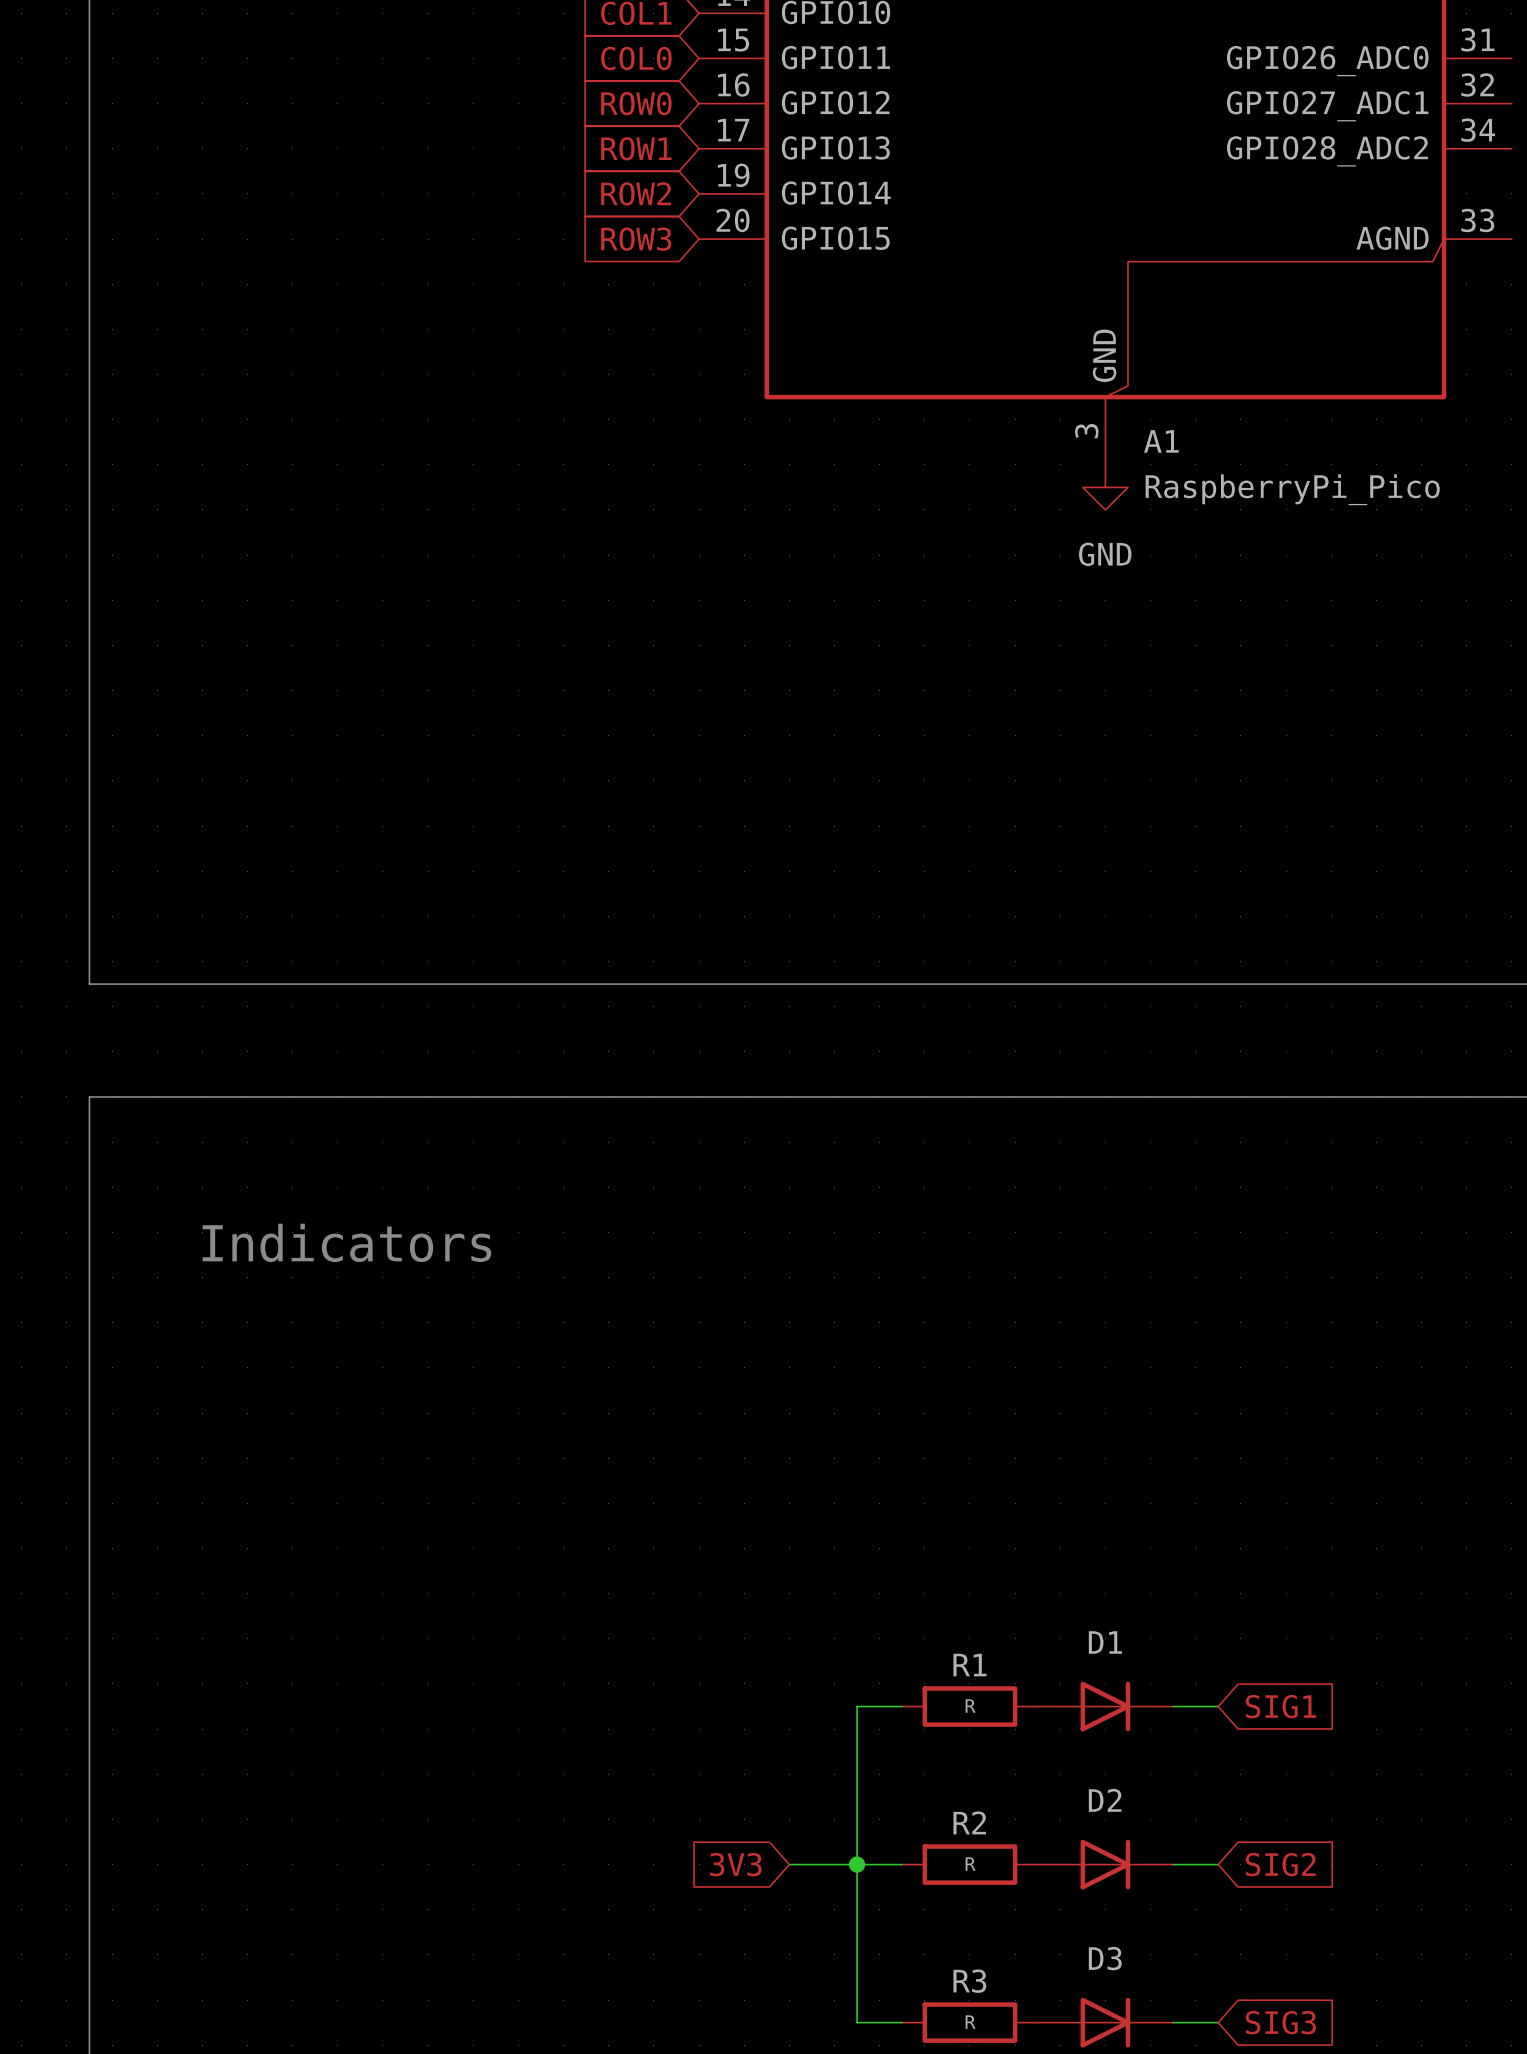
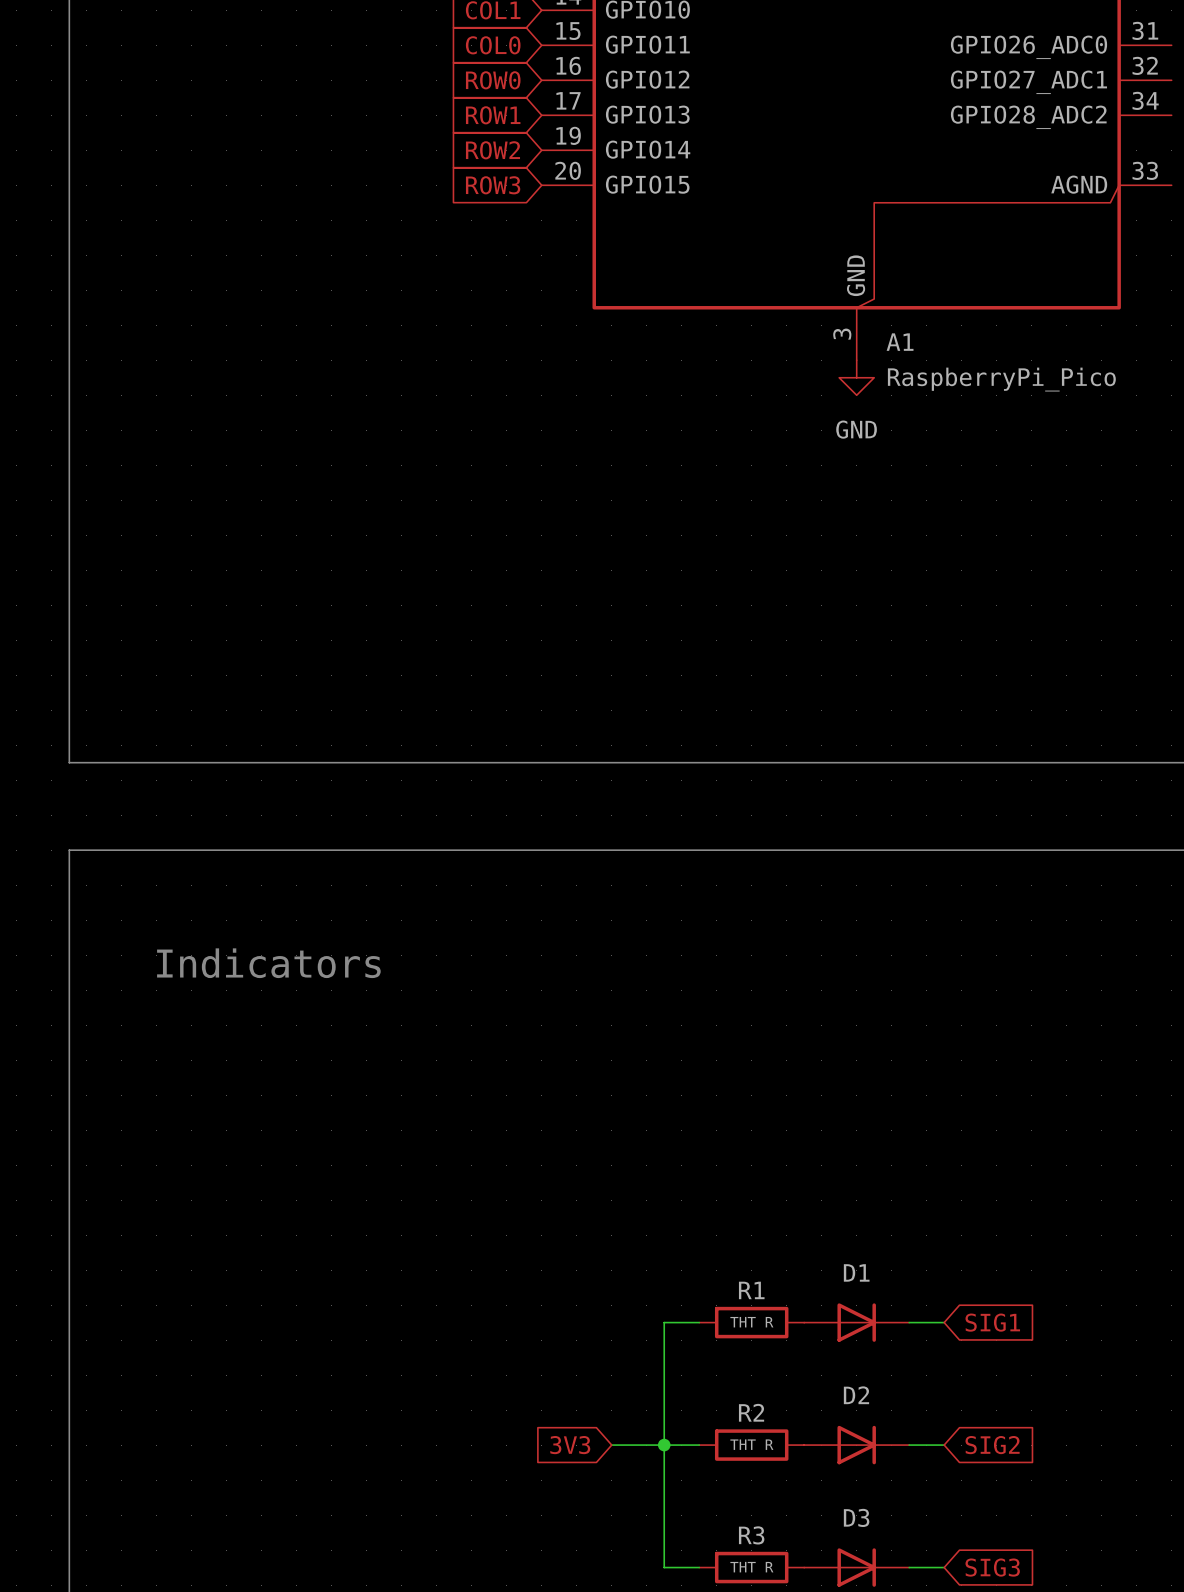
R1 value: R (970, 1706) -> THT R (751, 1322)
R2 value: R (970, 1864) -> THT R (751, 1444)
R3 value: R (970, 2022) -> THT R (751, 1567)

